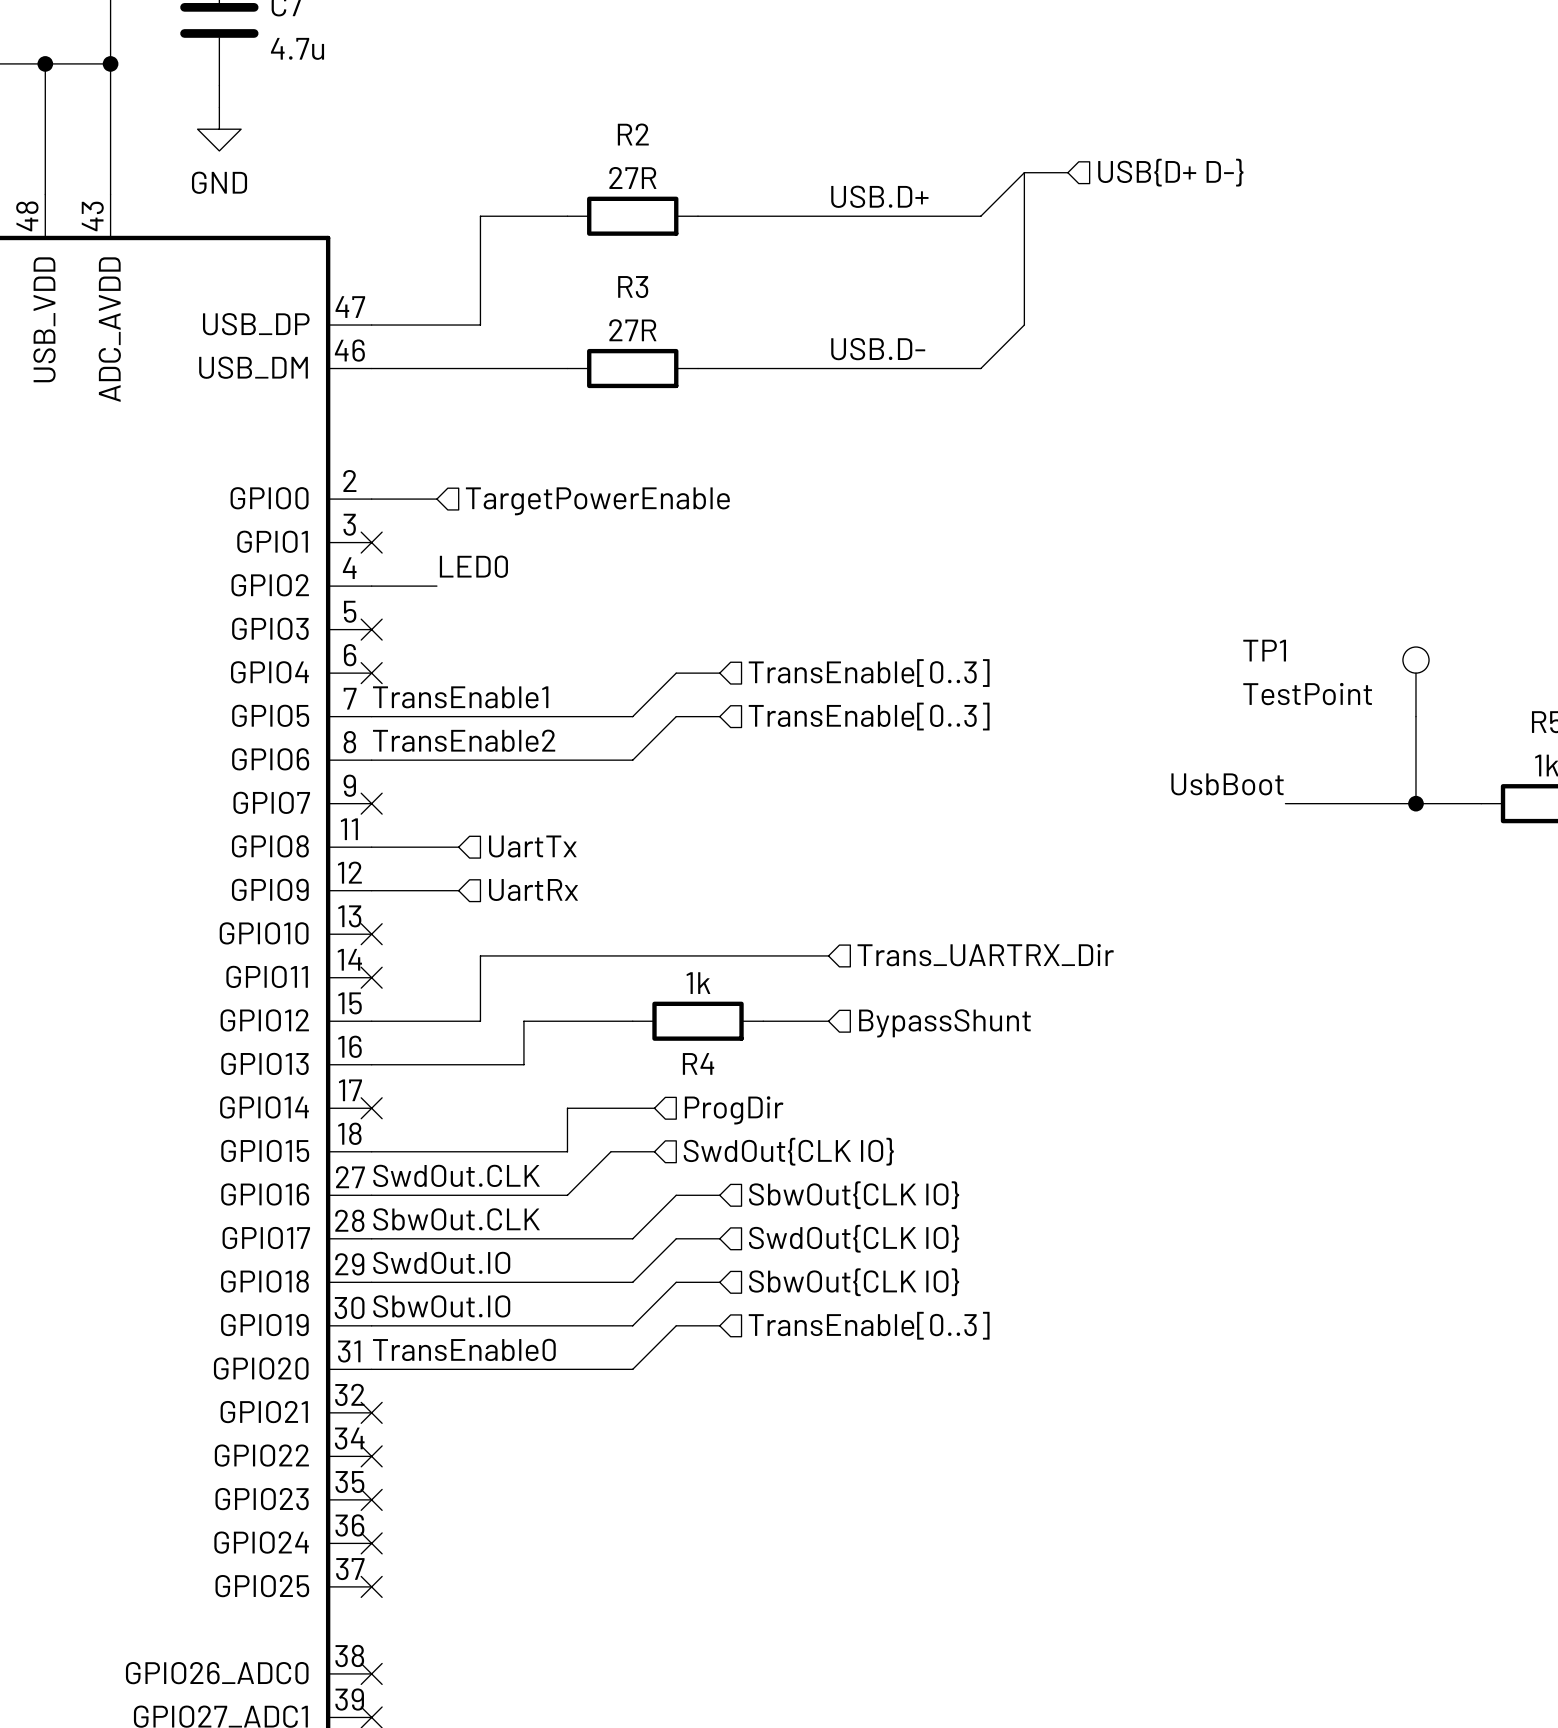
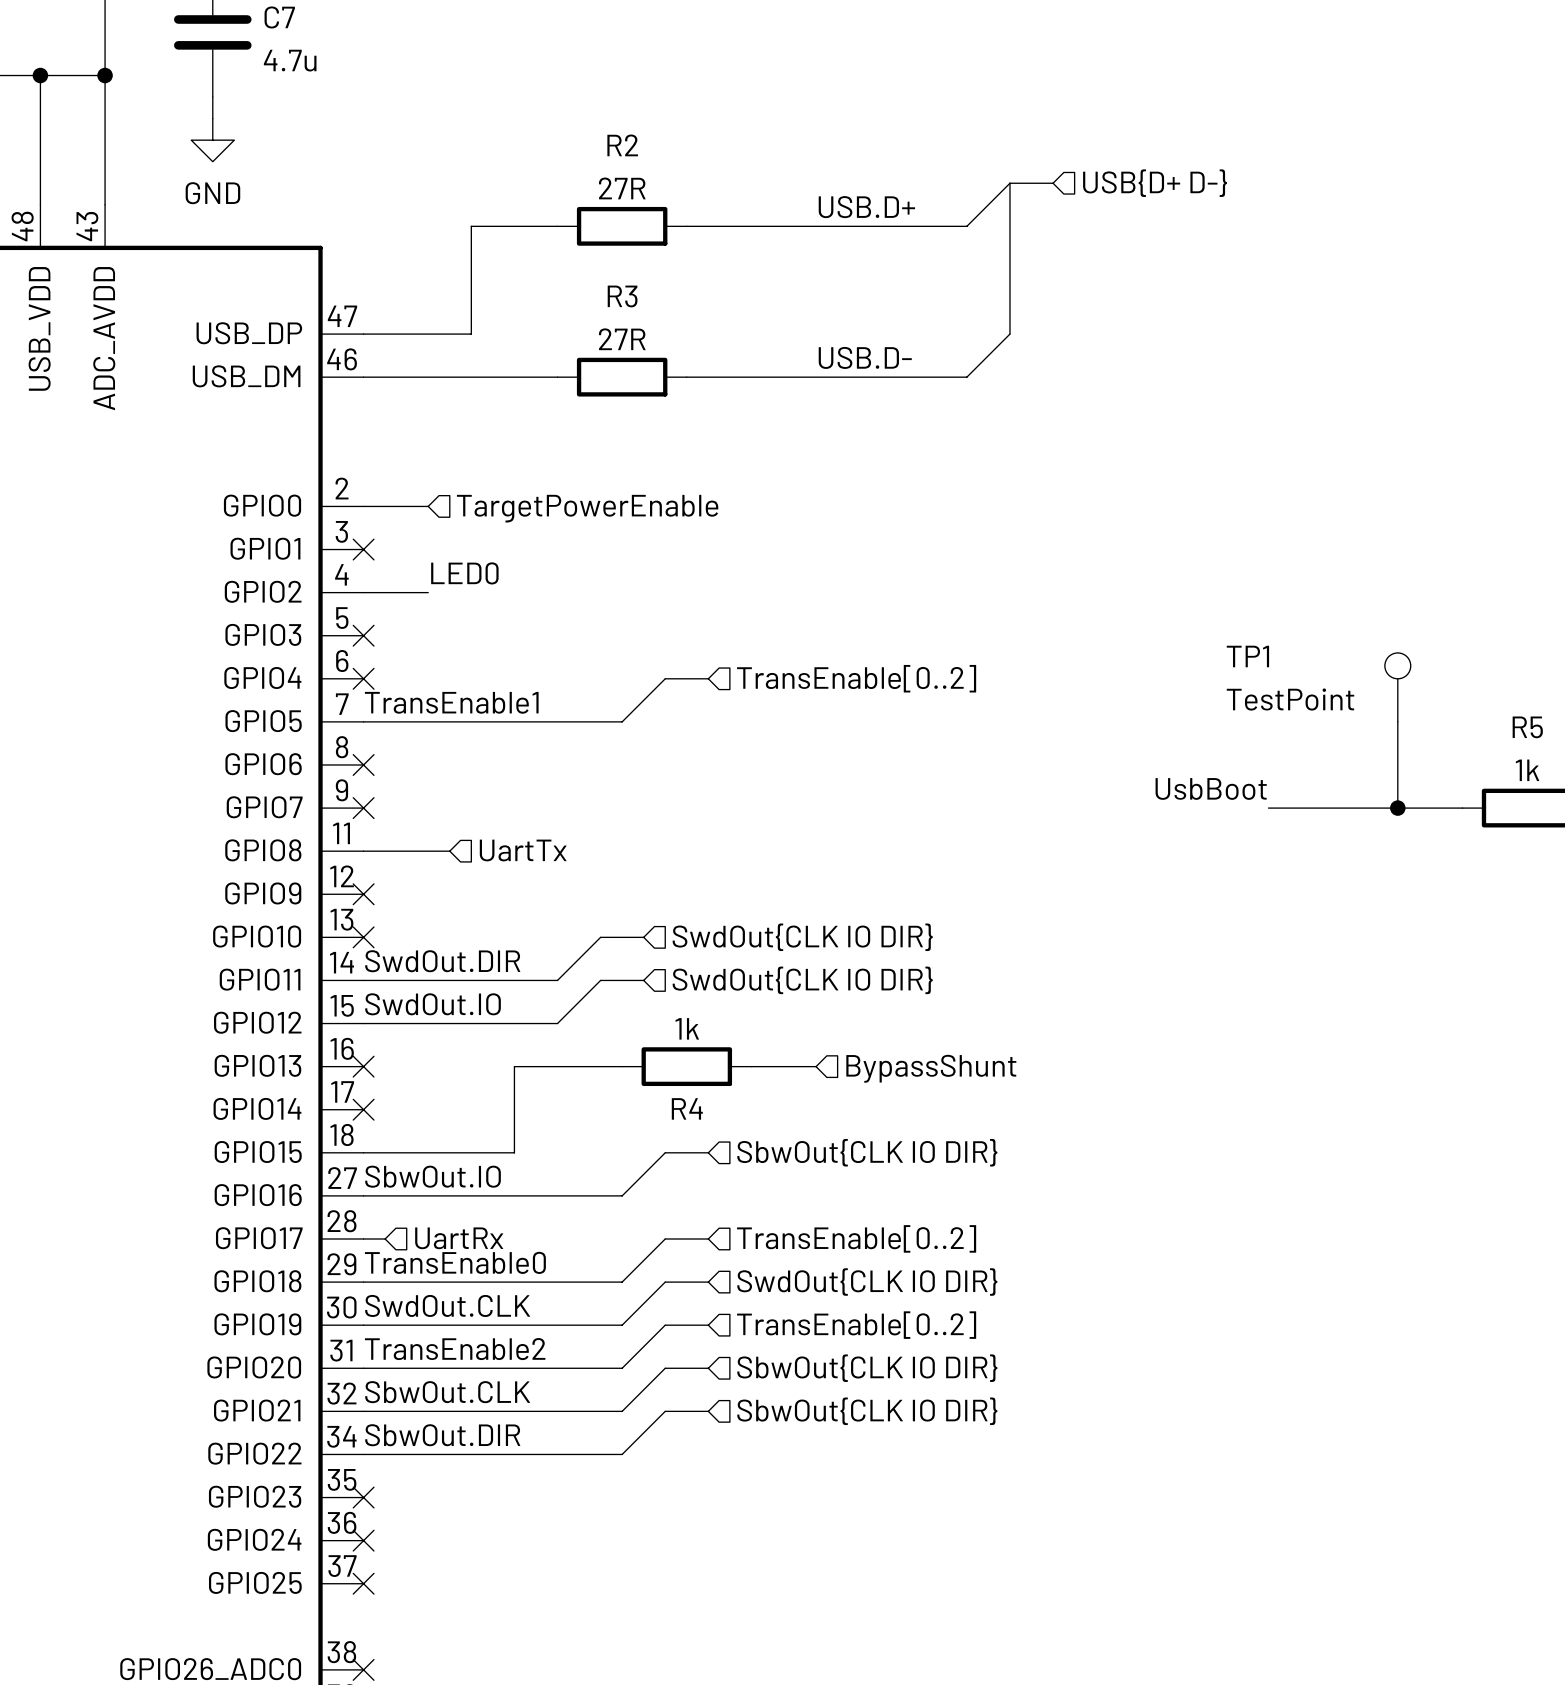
hierarchical label: TransEnable[0..3] (869, 673) -> TransEnable[0..2] (856, 678)
wire: (676, 716) (632, 760) (371, 760) -> none
bus: (676, 716) (719, 716) -> (600, 937) (643, 937)
hierarchical label: TransEnable[0..3] (869, 716) -> none
label: TransEnable2 (464, 740) -> none
no-connect mark: none -> (363, 764)
wire: (371, 890) (458, 890) -> none
no-connect mark: none -> (363, 894)
hierarchical label position: UartRx (533, 890) -> UartRx (459, 1238)
wire: none -> (600, 937) (557, 980) (363, 980)
hierarchical label: none -> SwdOut{CLK IO DIR} (802, 937)
wire: (828, 955) (480, 955) (480, 1021) -> none
hierarchical label: Trans_UARTRX_Dir (985, 955) -> none
label: none -> SwdOut.DIR (442, 961)
no-connect mark: (371, 977) -> none
hierarchical label: none -> SwdOut{CLK IO DIR} (802, 980)
label: none -> SwdOut.IO (433, 1004)
wire: (523, 1021) (523, 1064) (371, 1064) -> (514, 1023) (471, 1023)
wire: (567, 1021) (632, 1021) -> (557, 1023) (600, 980)
R4 position: (698, 1021) -> (686, 1066)
wire: (763, 1021) (828, 1021) -> (751, 1066) (816, 1066)
hierarchical label position: BypassShunt (944, 1023) -> BypassShunt (931, 1068)
no-connect mark: none -> (363, 1066)
wire: (654, 1108) (567, 1108) (567, 1151) (523, 1151) -> (622, 1066) (514, 1066) (514, 1152)
hierarchical label: ProgDir (734, 1110) -> none
wire: (610, 1151) (567, 1195) -> (665, 1152) (622, 1195) (557, 1195)
bus: (610, 1151) (654, 1151) -> (600, 980) (643, 980)
hierarchical label: SwdOut{CLK IO} (788, 1151) -> none
hierarchical label: none -> SbwOut{CLK IO DIR} (867, 1152)
label: SwdOut.CLK (456, 1175) -> SbwOut.IO (433, 1176)
wire: (676, 1195) (632, 1238) (393, 1238) -> none
bus: (676, 1195) (719, 1195) -> (665, 1152) (708, 1152)
hierarchical label: SbwOut{CLK IO} (854, 1195) -> none
label position: SbwOut.CLK (456, 1219) -> SbwOut.CLK (447, 1392)
hierarchical label: SwdOut{CLK IO} (854, 1238) -> TransEnable[0..2] (856, 1238)
label: SwdOut.IO (441, 1262) -> TransEnable0 (455, 1262)
hierarchical label: SbwOut{CLK IO} (854, 1282) -> SwdOut{CLK IO DIR} (867, 1282)
label: SbwOut.IO (441, 1306) -> SwdOut.CLK (447, 1305)
hierarchical label: TransEnable[0..3] (869, 1325) -> TransEnable[0..2] (856, 1325)
label: TransEnable0 (464, 1349) -> TransEnable2 (455, 1349)
wire: none -> (665, 1368) (622, 1411) (363, 1411)
bus: none -> (665, 1368) (708, 1368)
hierarchical label: none -> SbwOut{CLK IO DIR} (867, 1368)
no-connect mark: (371, 1412) -> none
wire: none -> (665, 1411) (622, 1454) (363, 1454)
bus: none -> (665, 1411) (708, 1411)
hierarchical label: none -> SbwOut{CLK IO DIR} (867, 1411)
label: none -> SbwOut.DIR (442, 1435)
no-connect mark: (371, 1456) -> none

